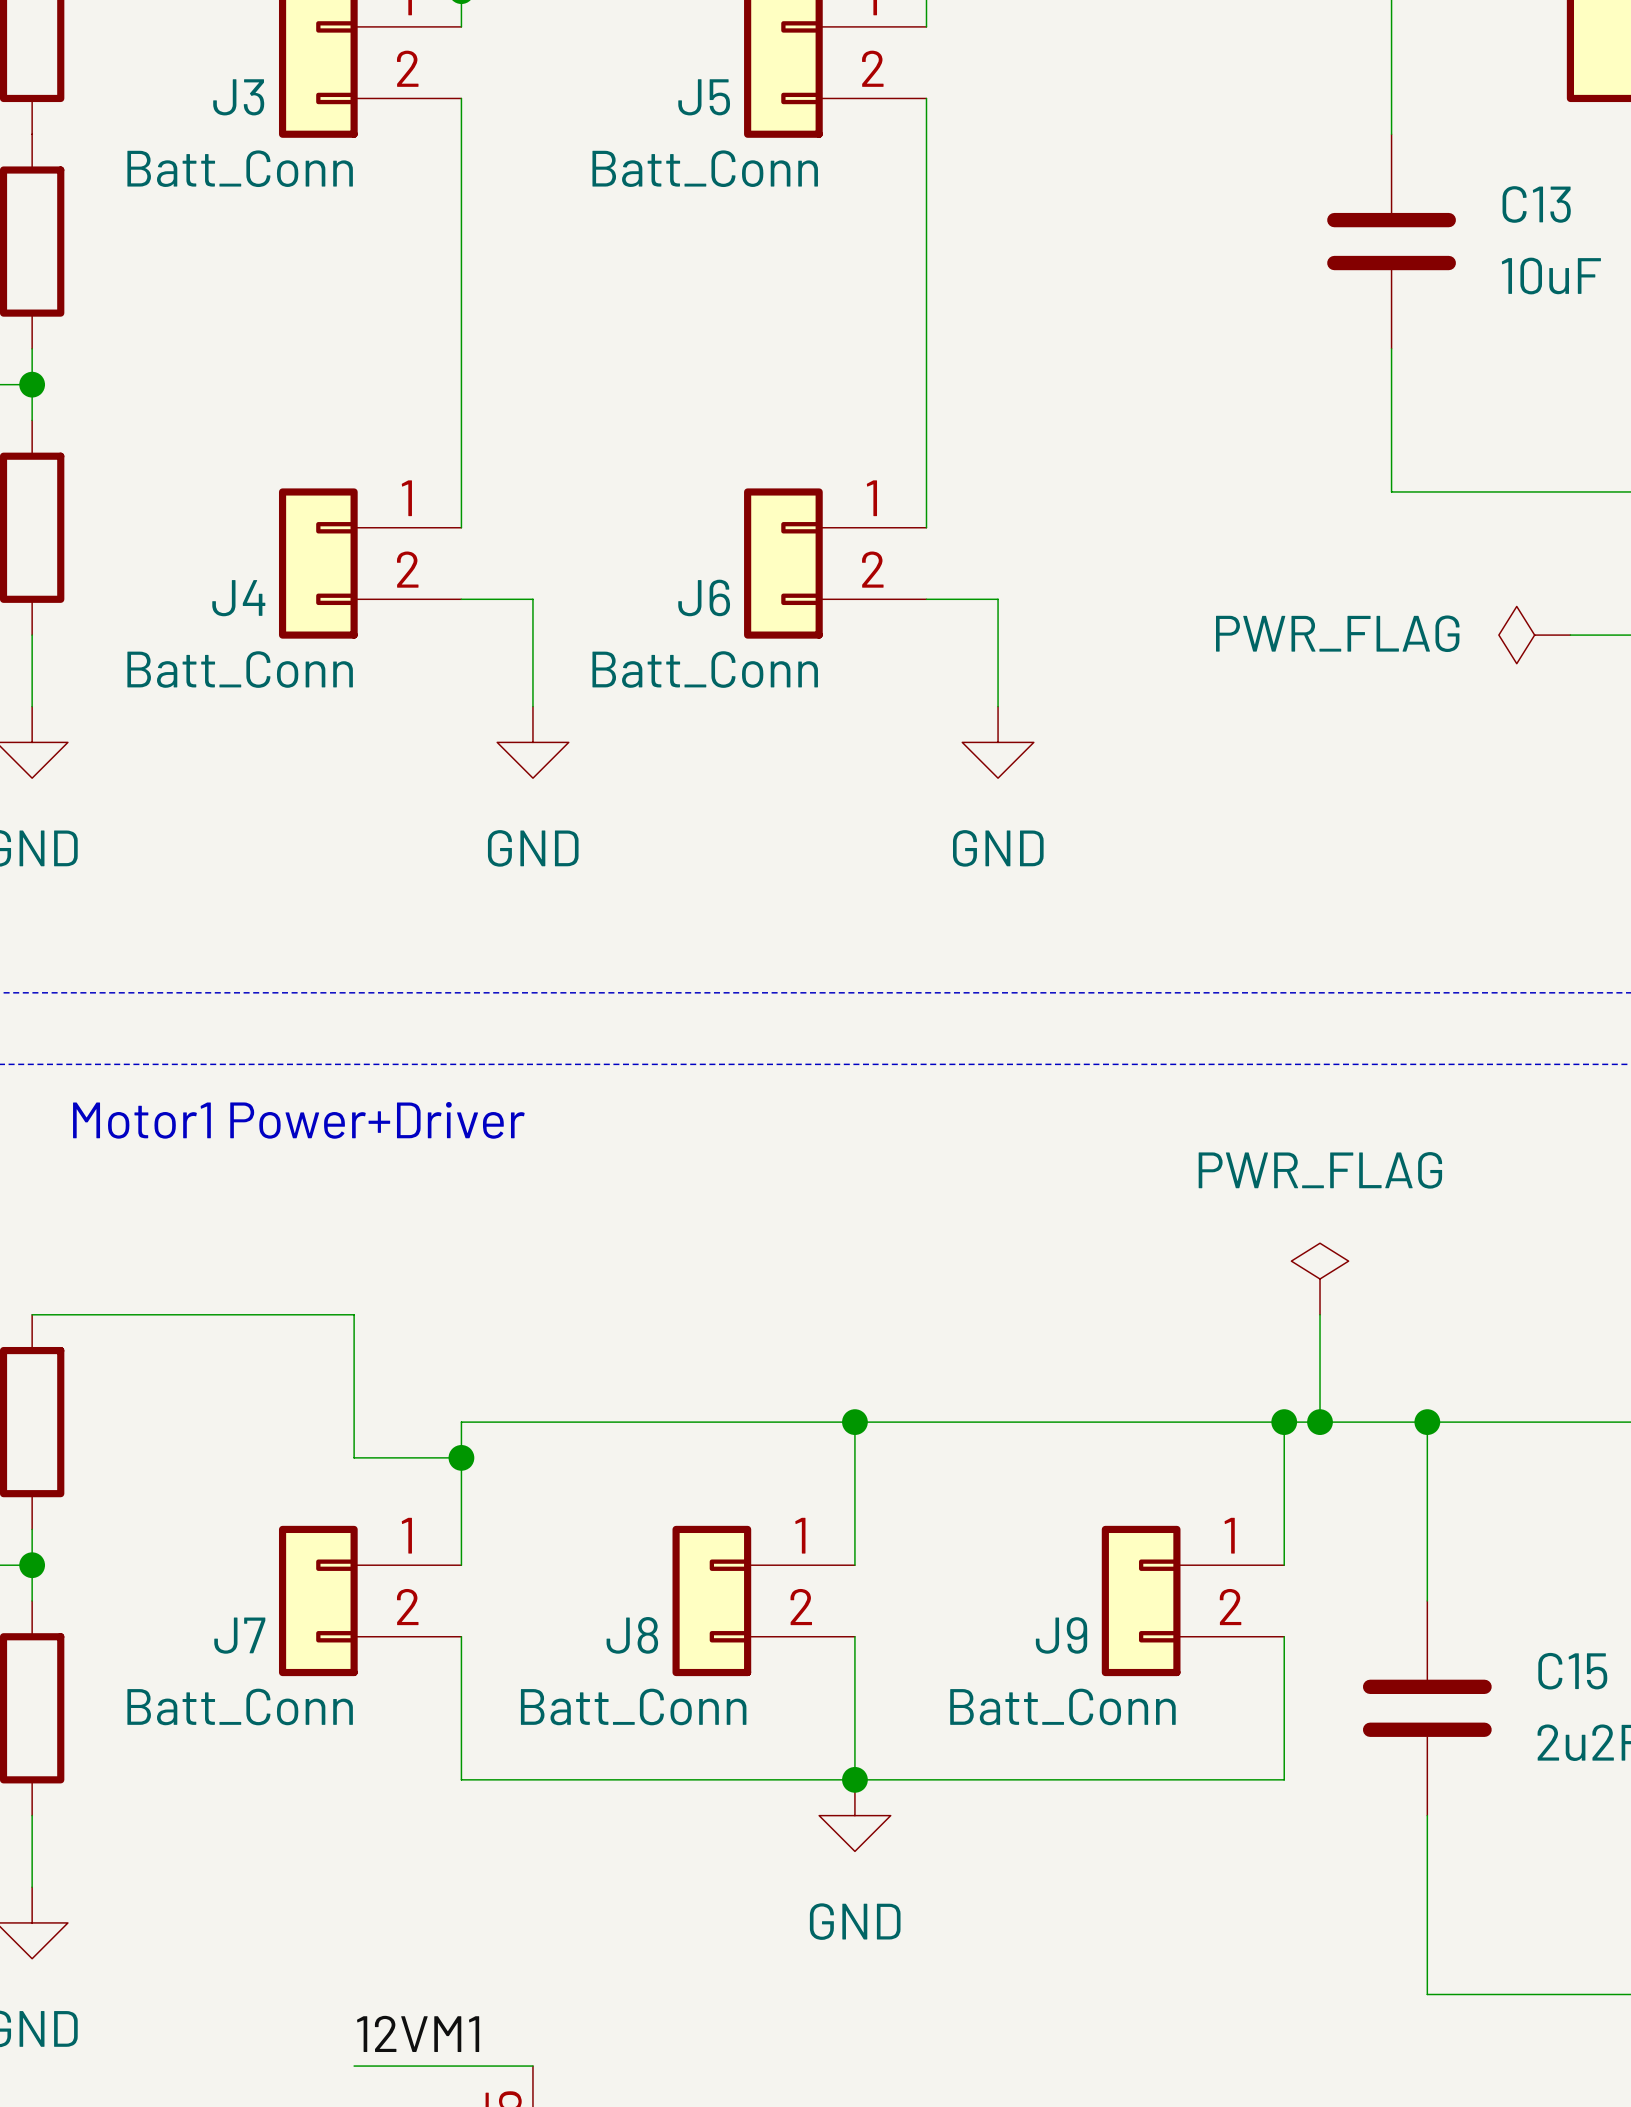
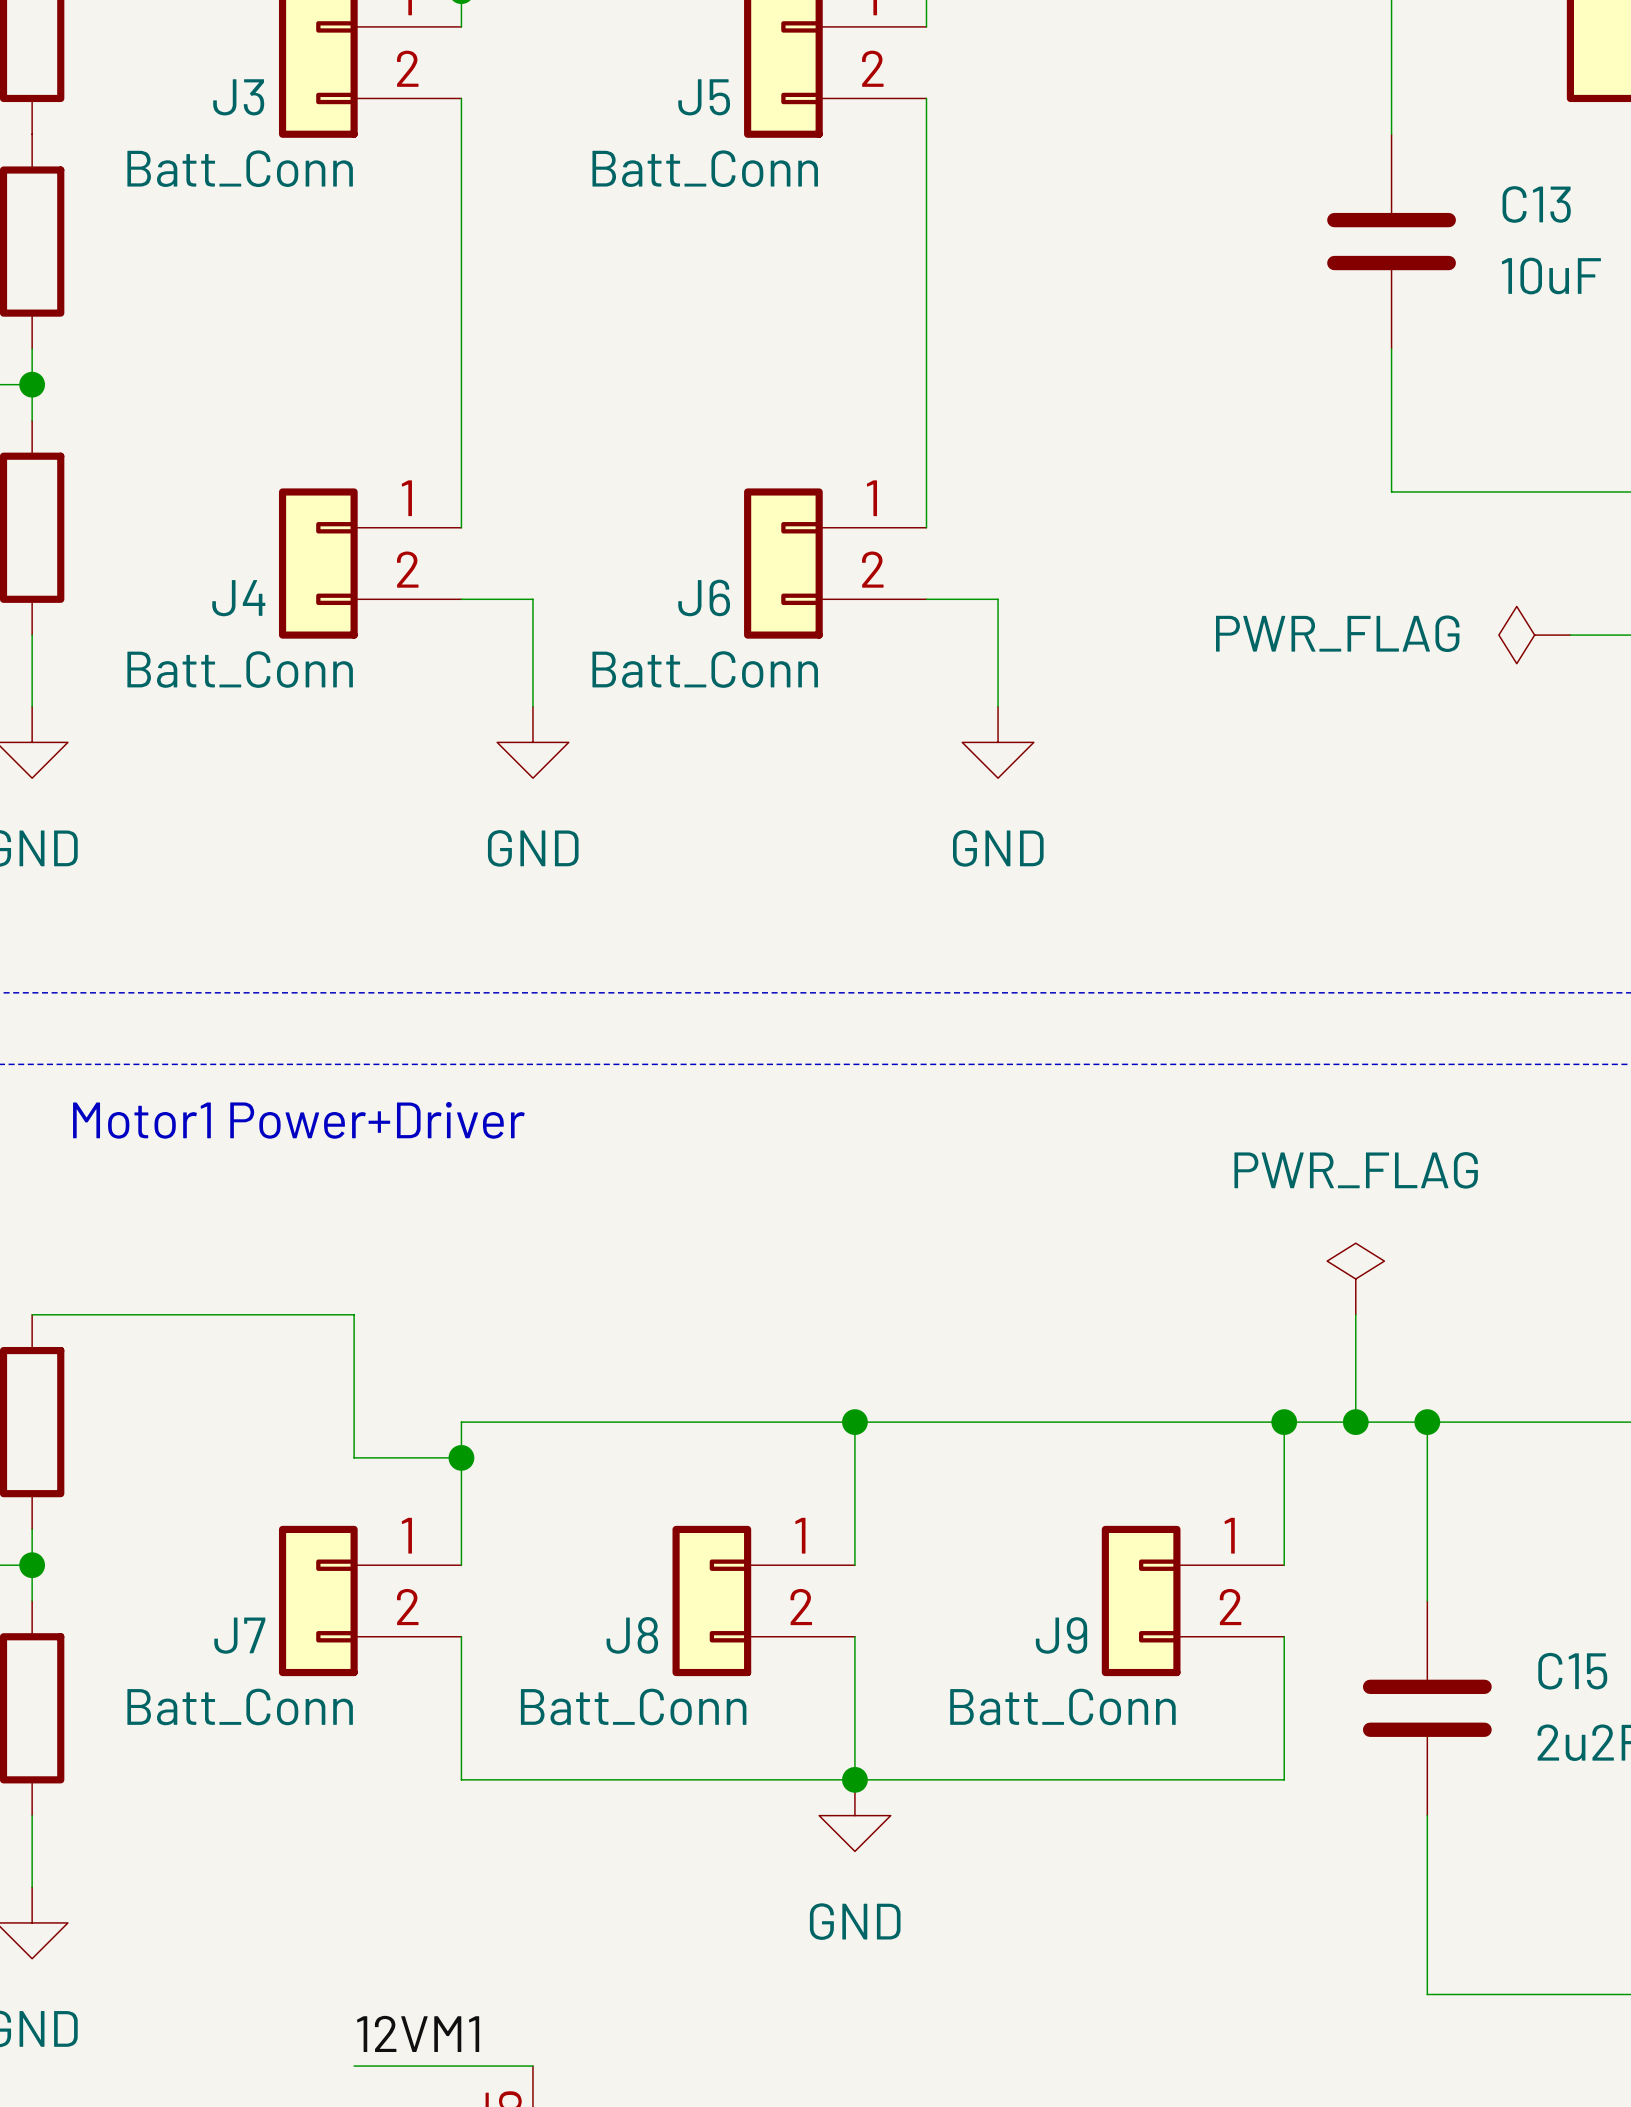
power symbol position: PWR_FLAG (1320, 1279) -> PWR_FLAG (1355, 1279)
wire: (1320, 1314) (1320, 1422) -> (1355, 1314) (1355, 1422)
junction position: (1320, 1422) -> (1355, 1422)

